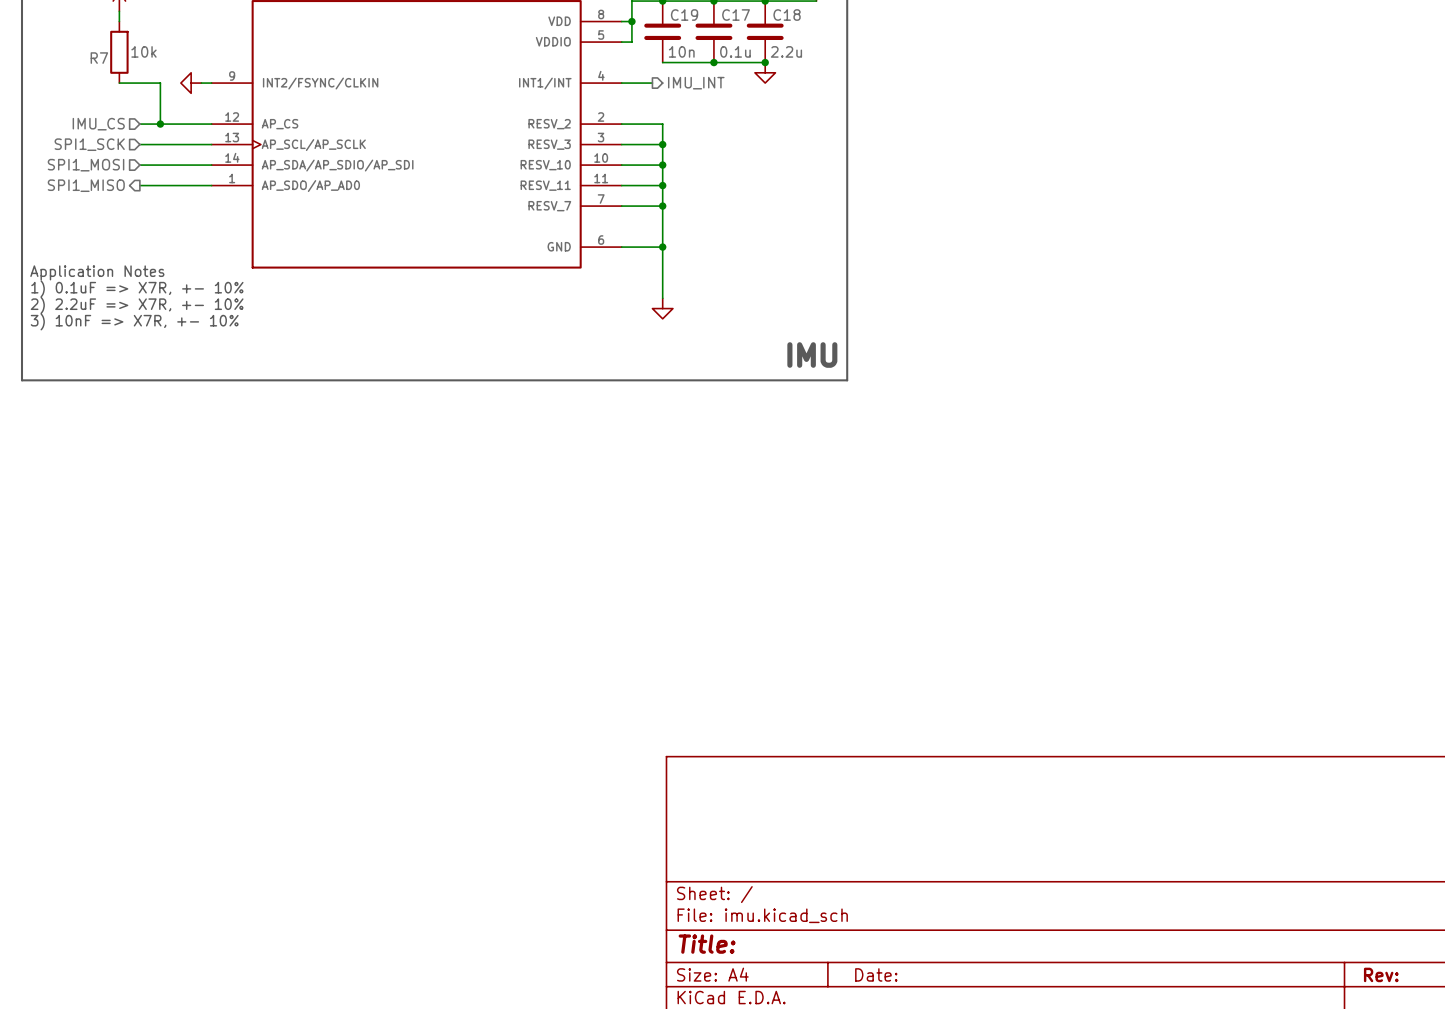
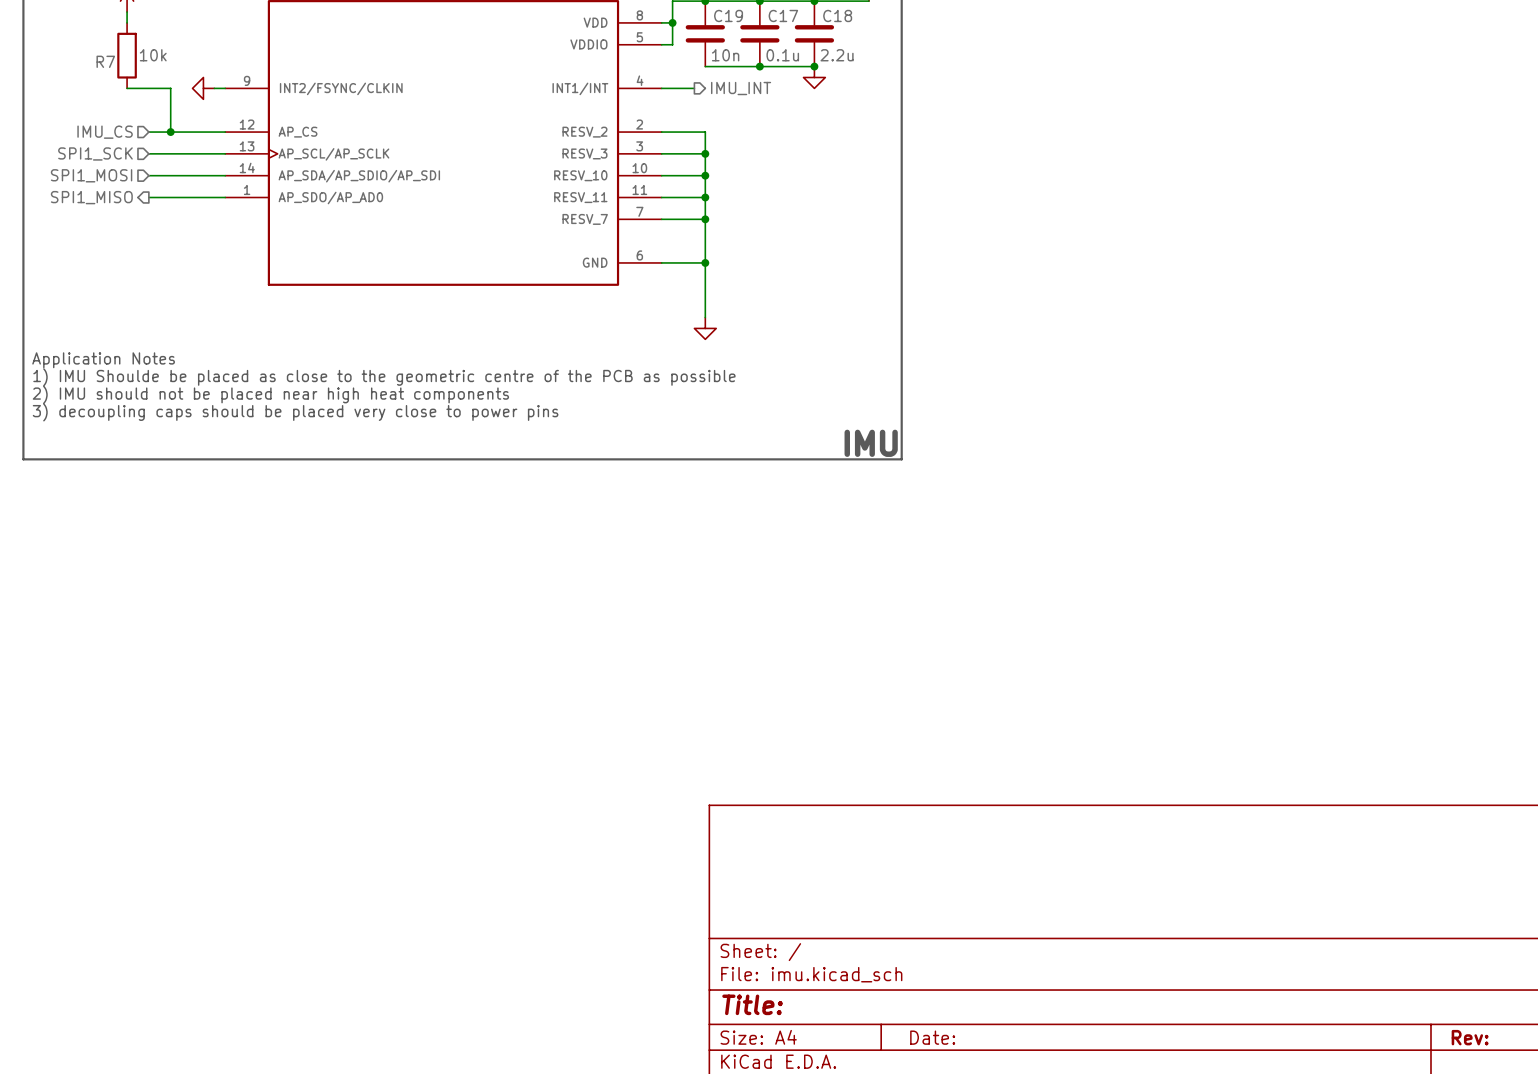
text position: Application Notes (97, 272) -> Application Notes (103, 360)
text: 1) 0.1uF => X7R, +- 10% (137, 288) -> none
text: 2) 2.2uF => X7R, +- 10% (137, 305) -> none
text: 3) 10nF => X7R, +- 10% (134, 321) -> none
text: none -> 1) IMU Shoulde be placed as close to the geometric centre of the PCB as possible (384, 377)
text position: IMU (812, 355) -> IMU (871, 443)
text: none -> 2) IMU should not be placed near high heat components (270, 394)
line: (22, 380) (847, 380) -> (23, 404) (23, 459) (901, 459) (901, 404)
text: none -> 3) decoupling caps should be placed very close to power pins (295, 412)

